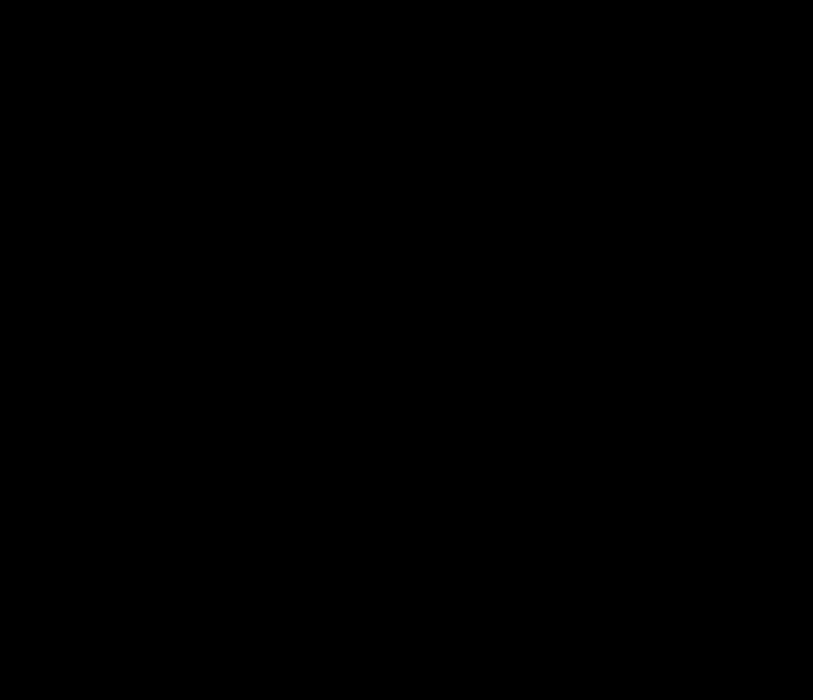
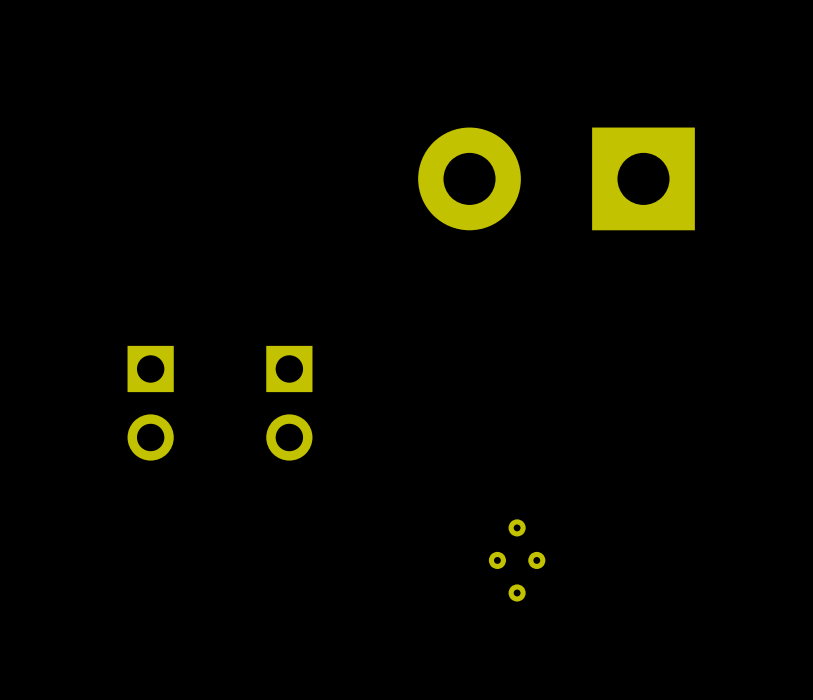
part: none -> (556, 178)
part: none -> (150, 403)
part: none -> (289, 403)
part: none -> (517, 560)

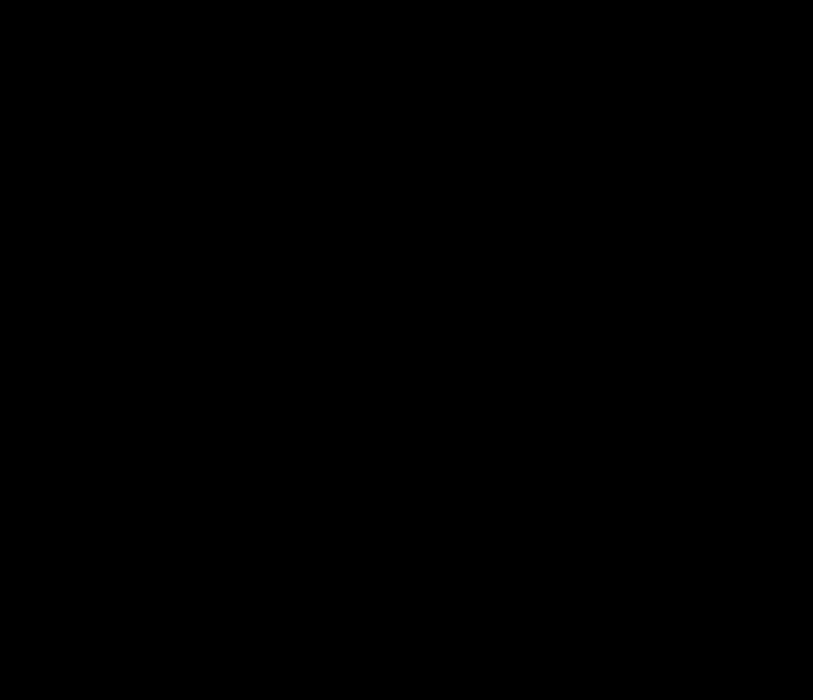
part: (556, 178) -> none
part: (150, 403) -> none
part: (289, 403) -> none
part: (517, 560) -> none

